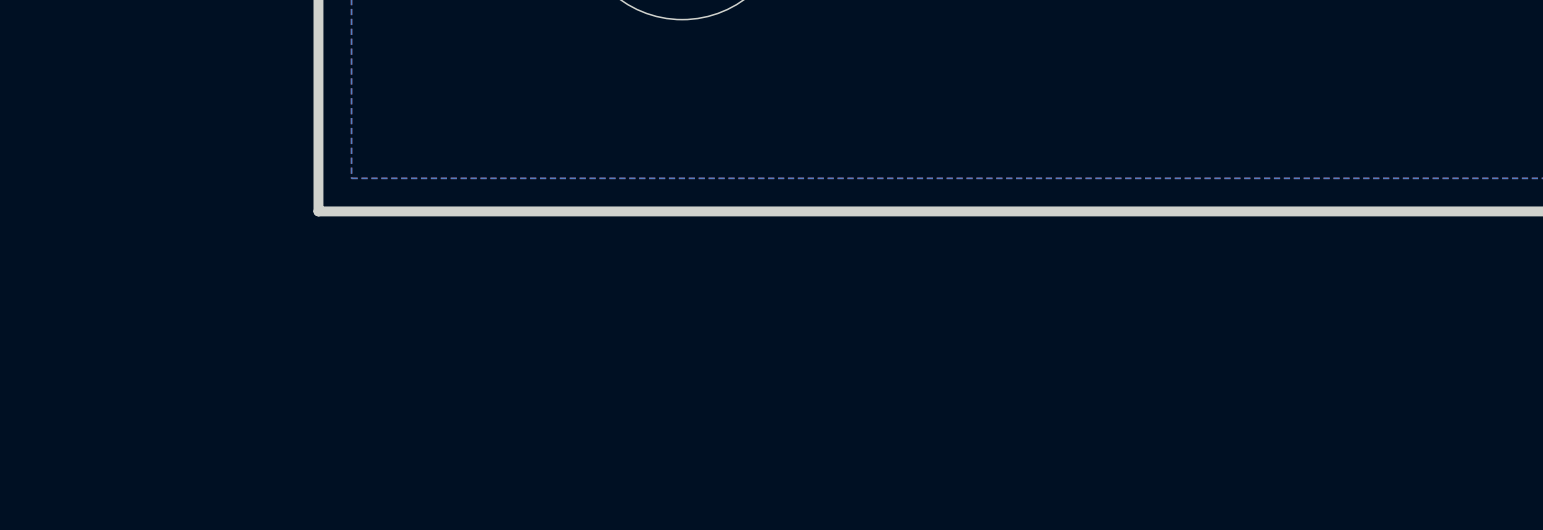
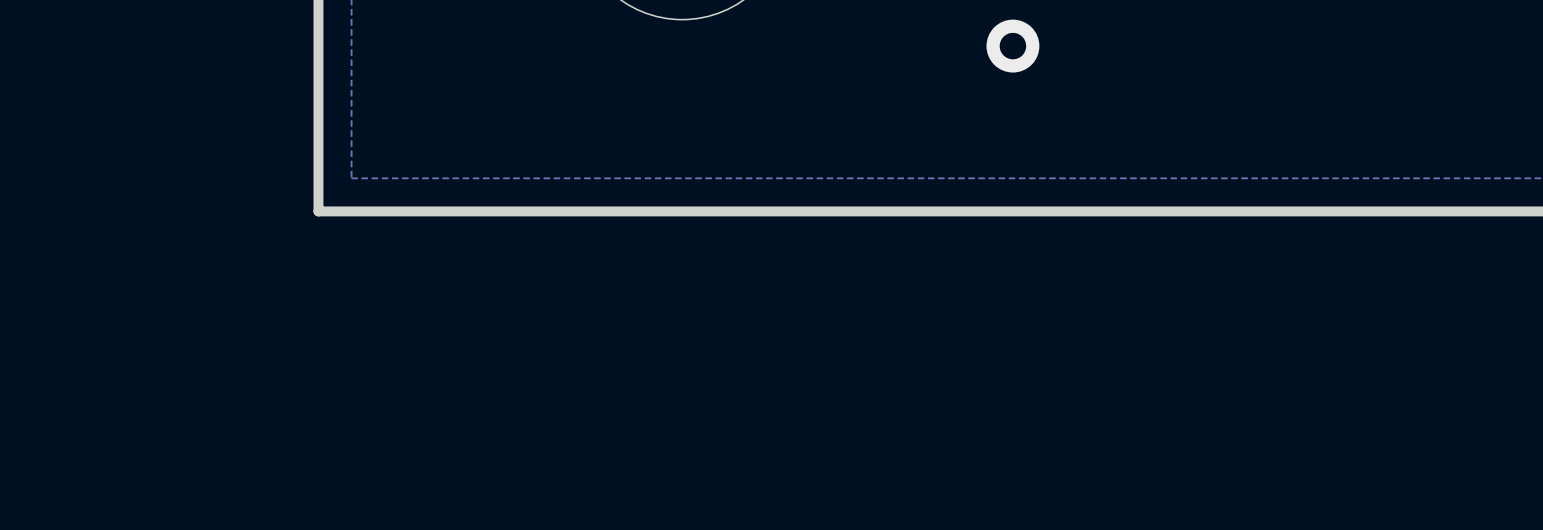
via: none -> (1012, 46)

